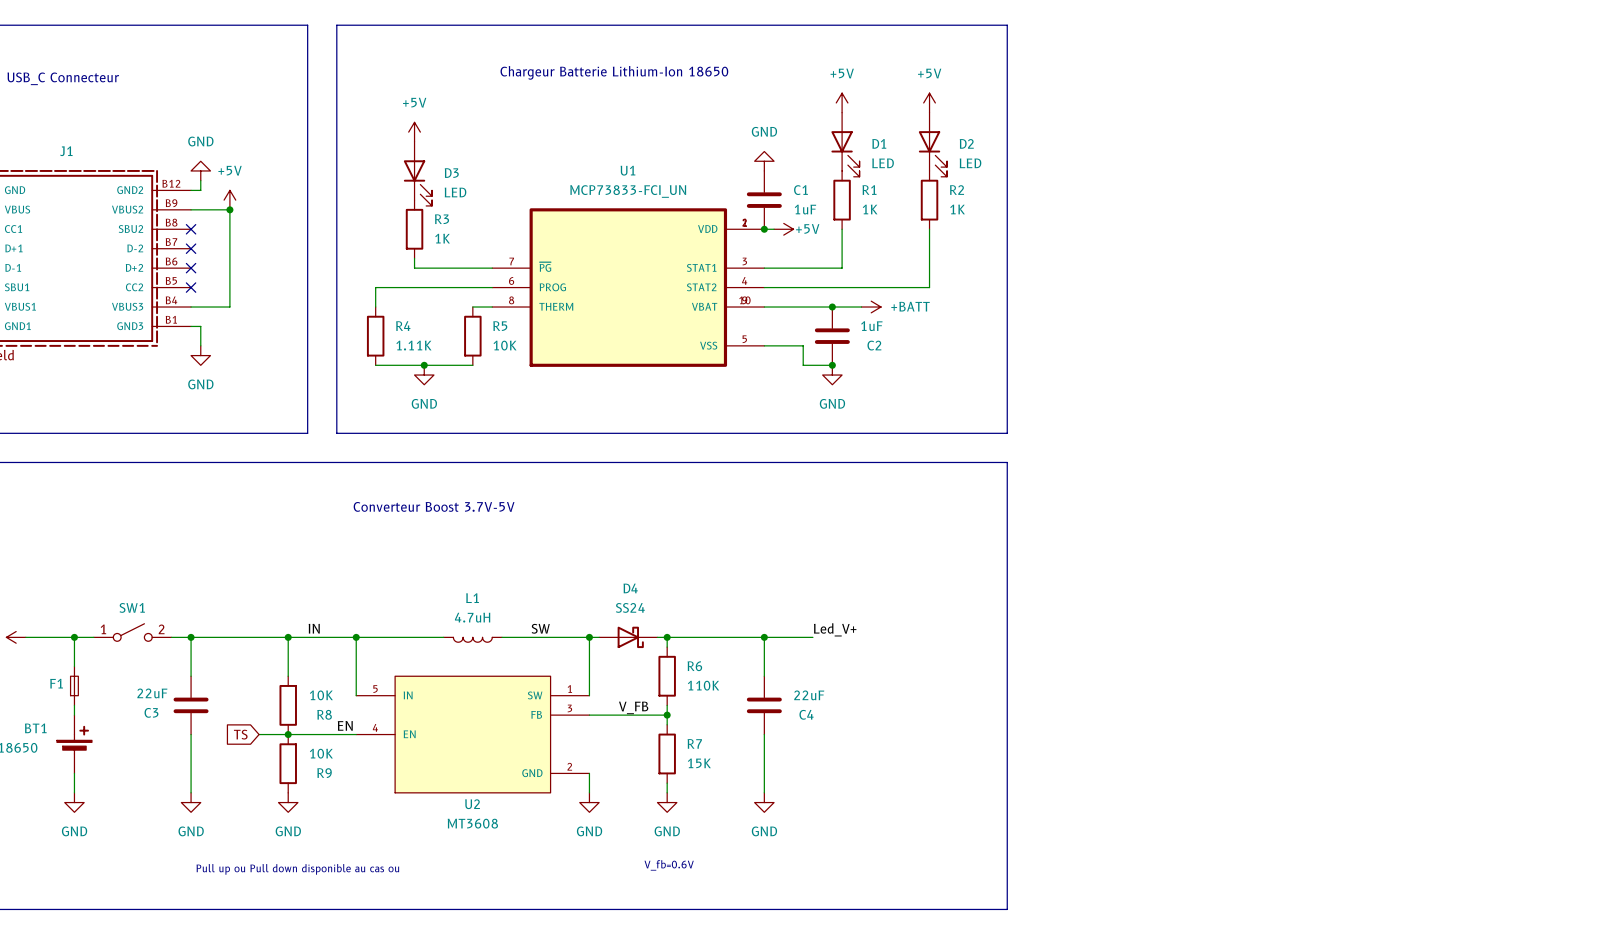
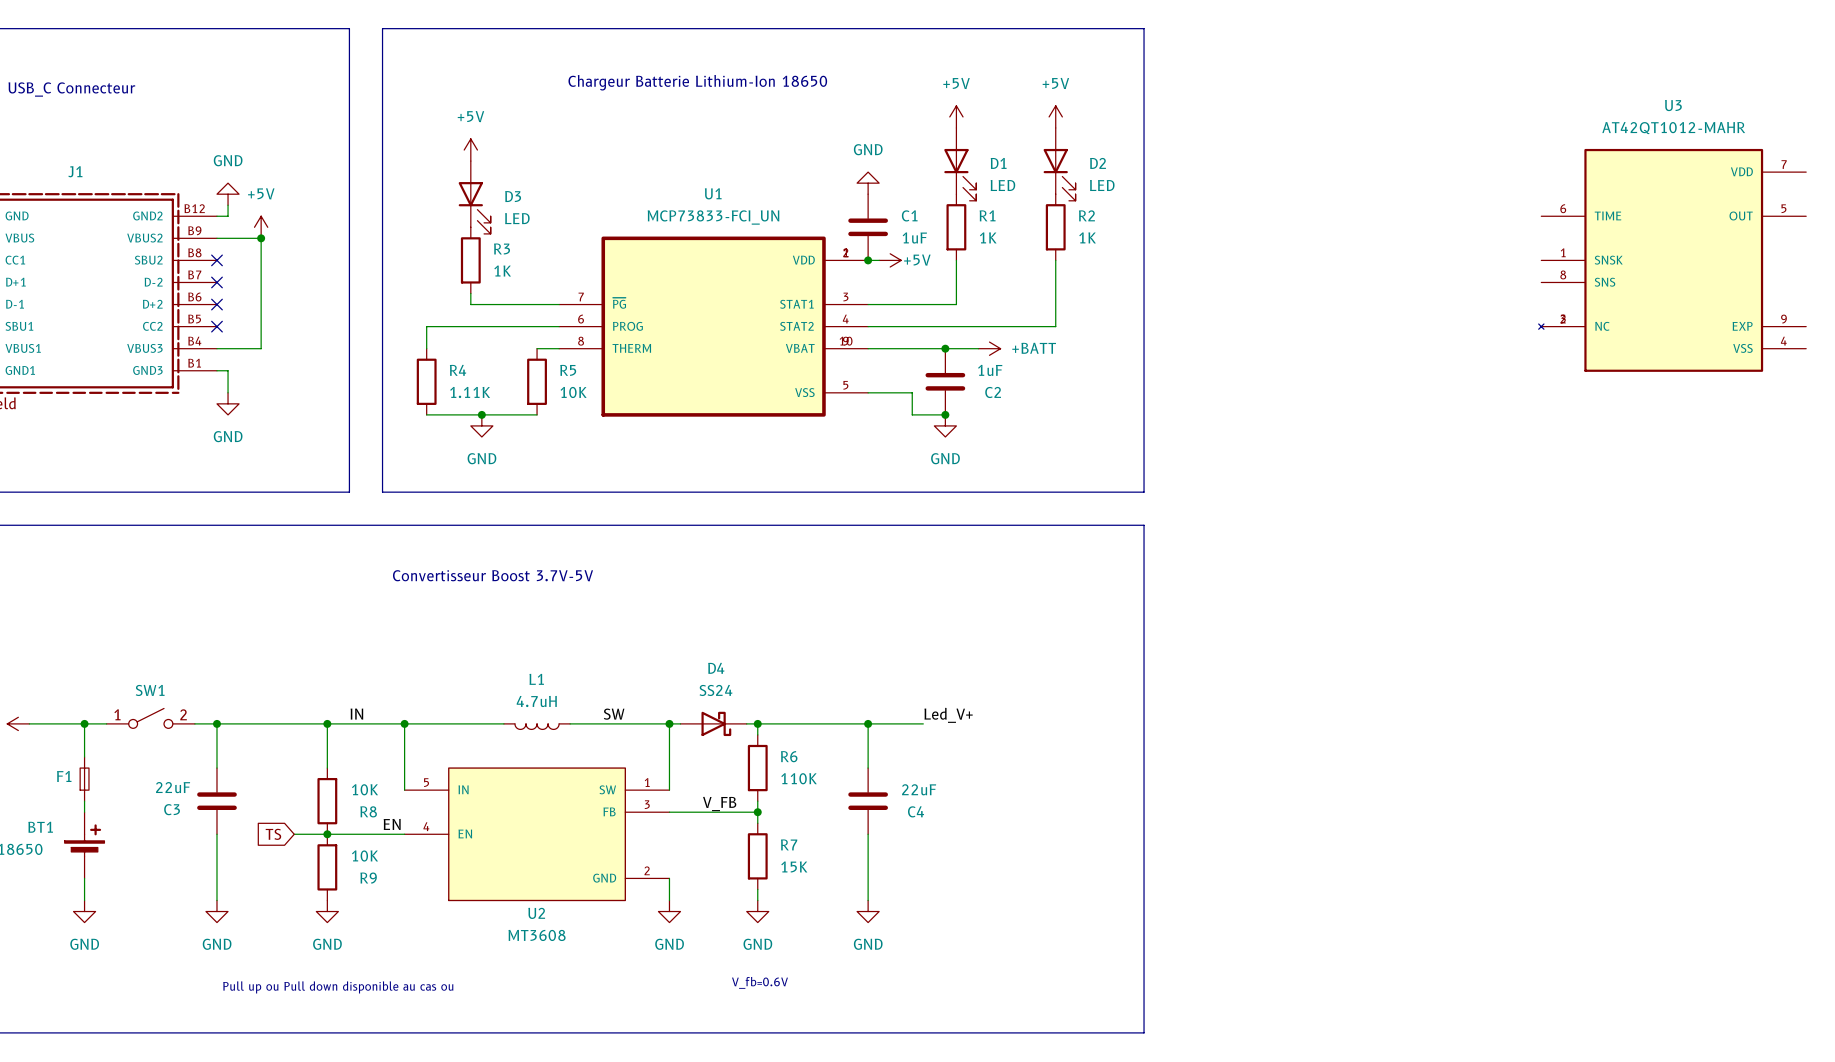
U3: none -> AT42QT1012-MAHR (1672, 260)
text: Converteur Boost 3.7V-5V (434, 506) -> Convertisseur Boost 3.7V-5V (493, 575)

